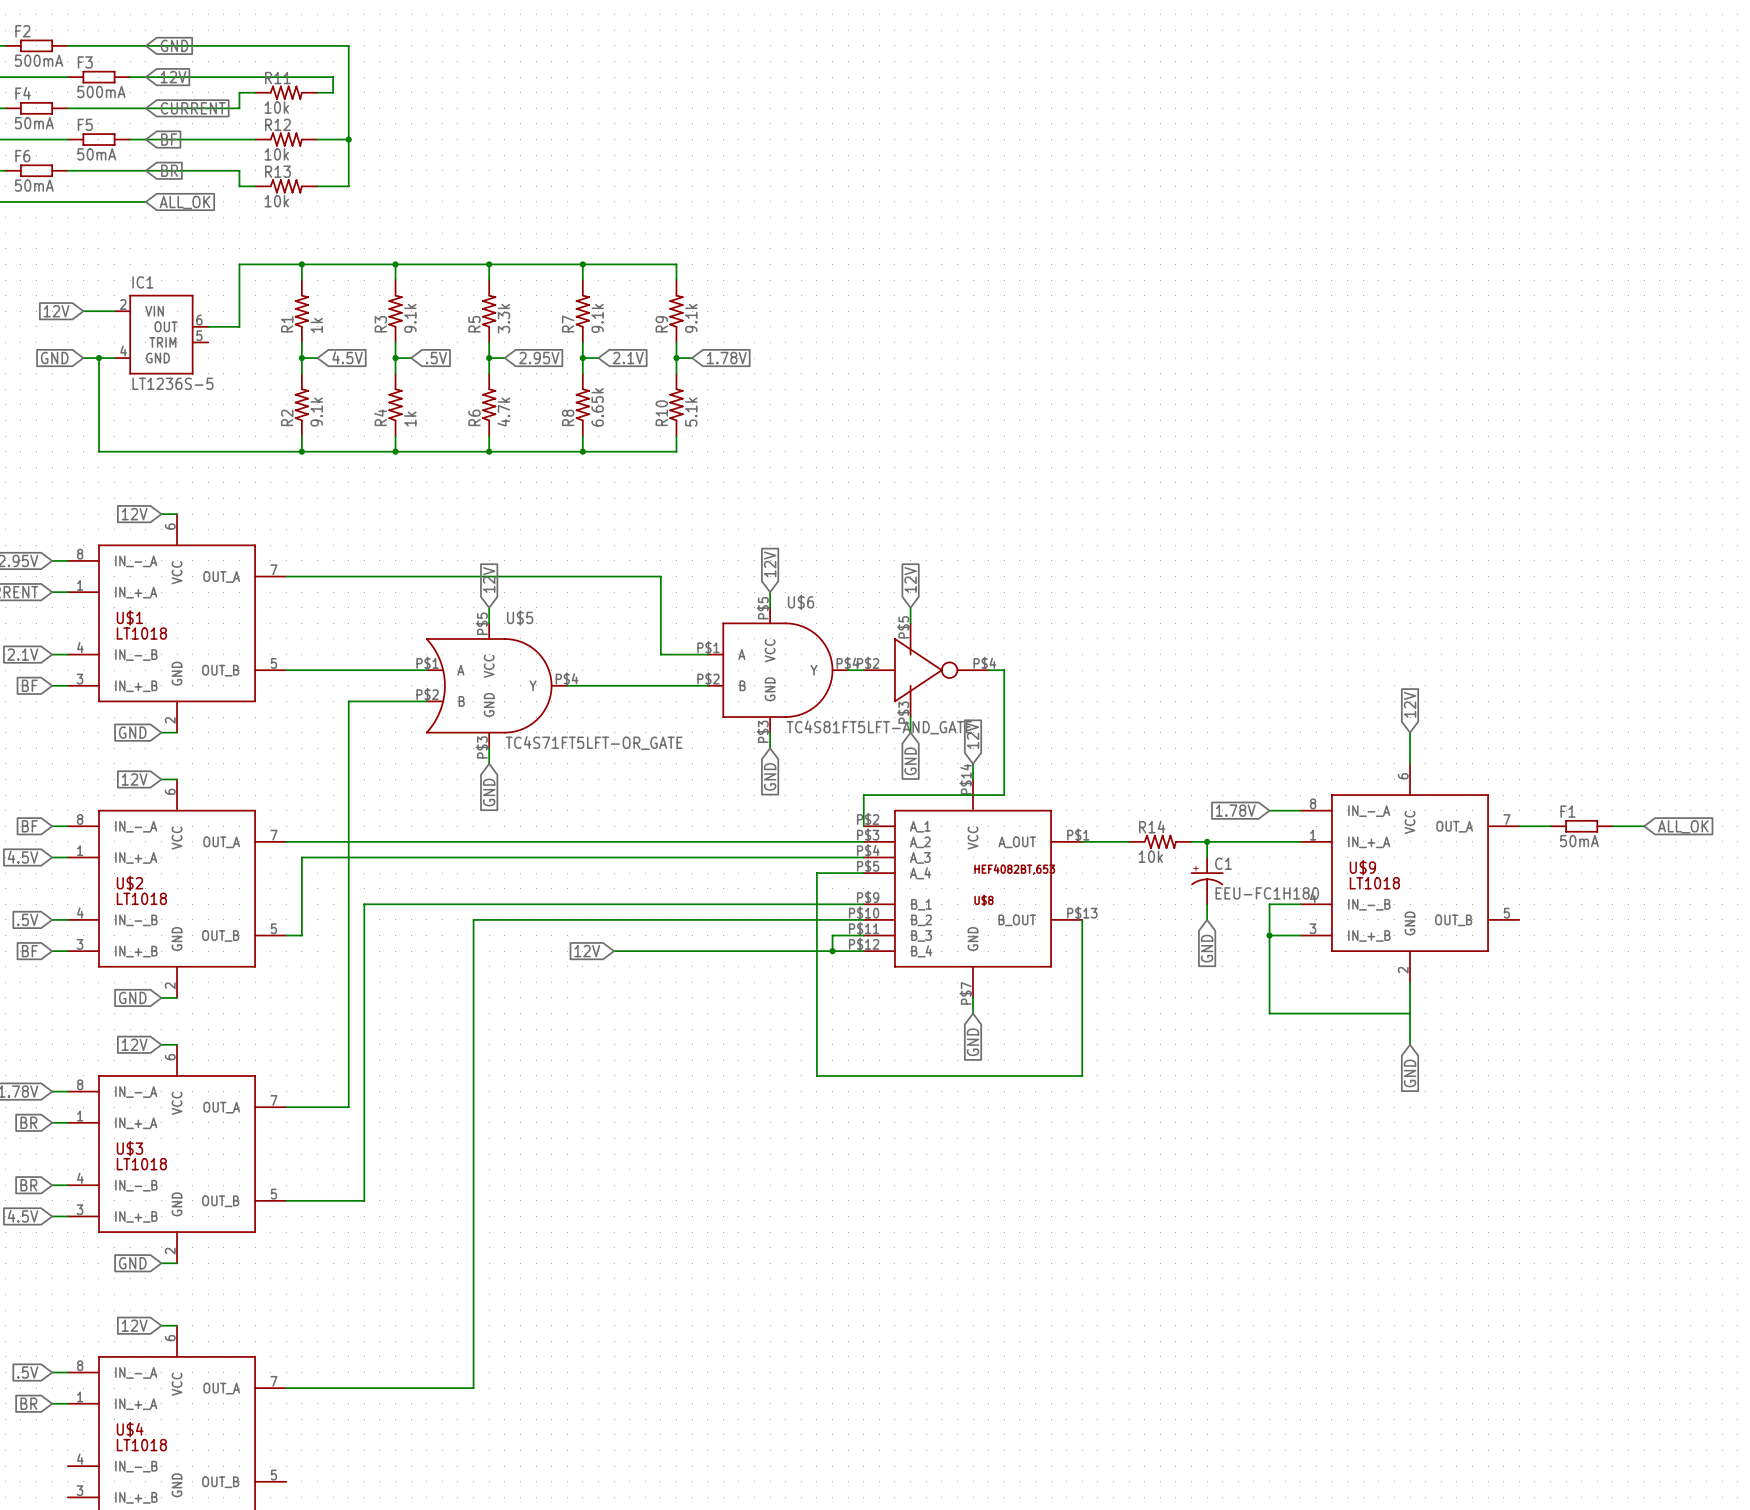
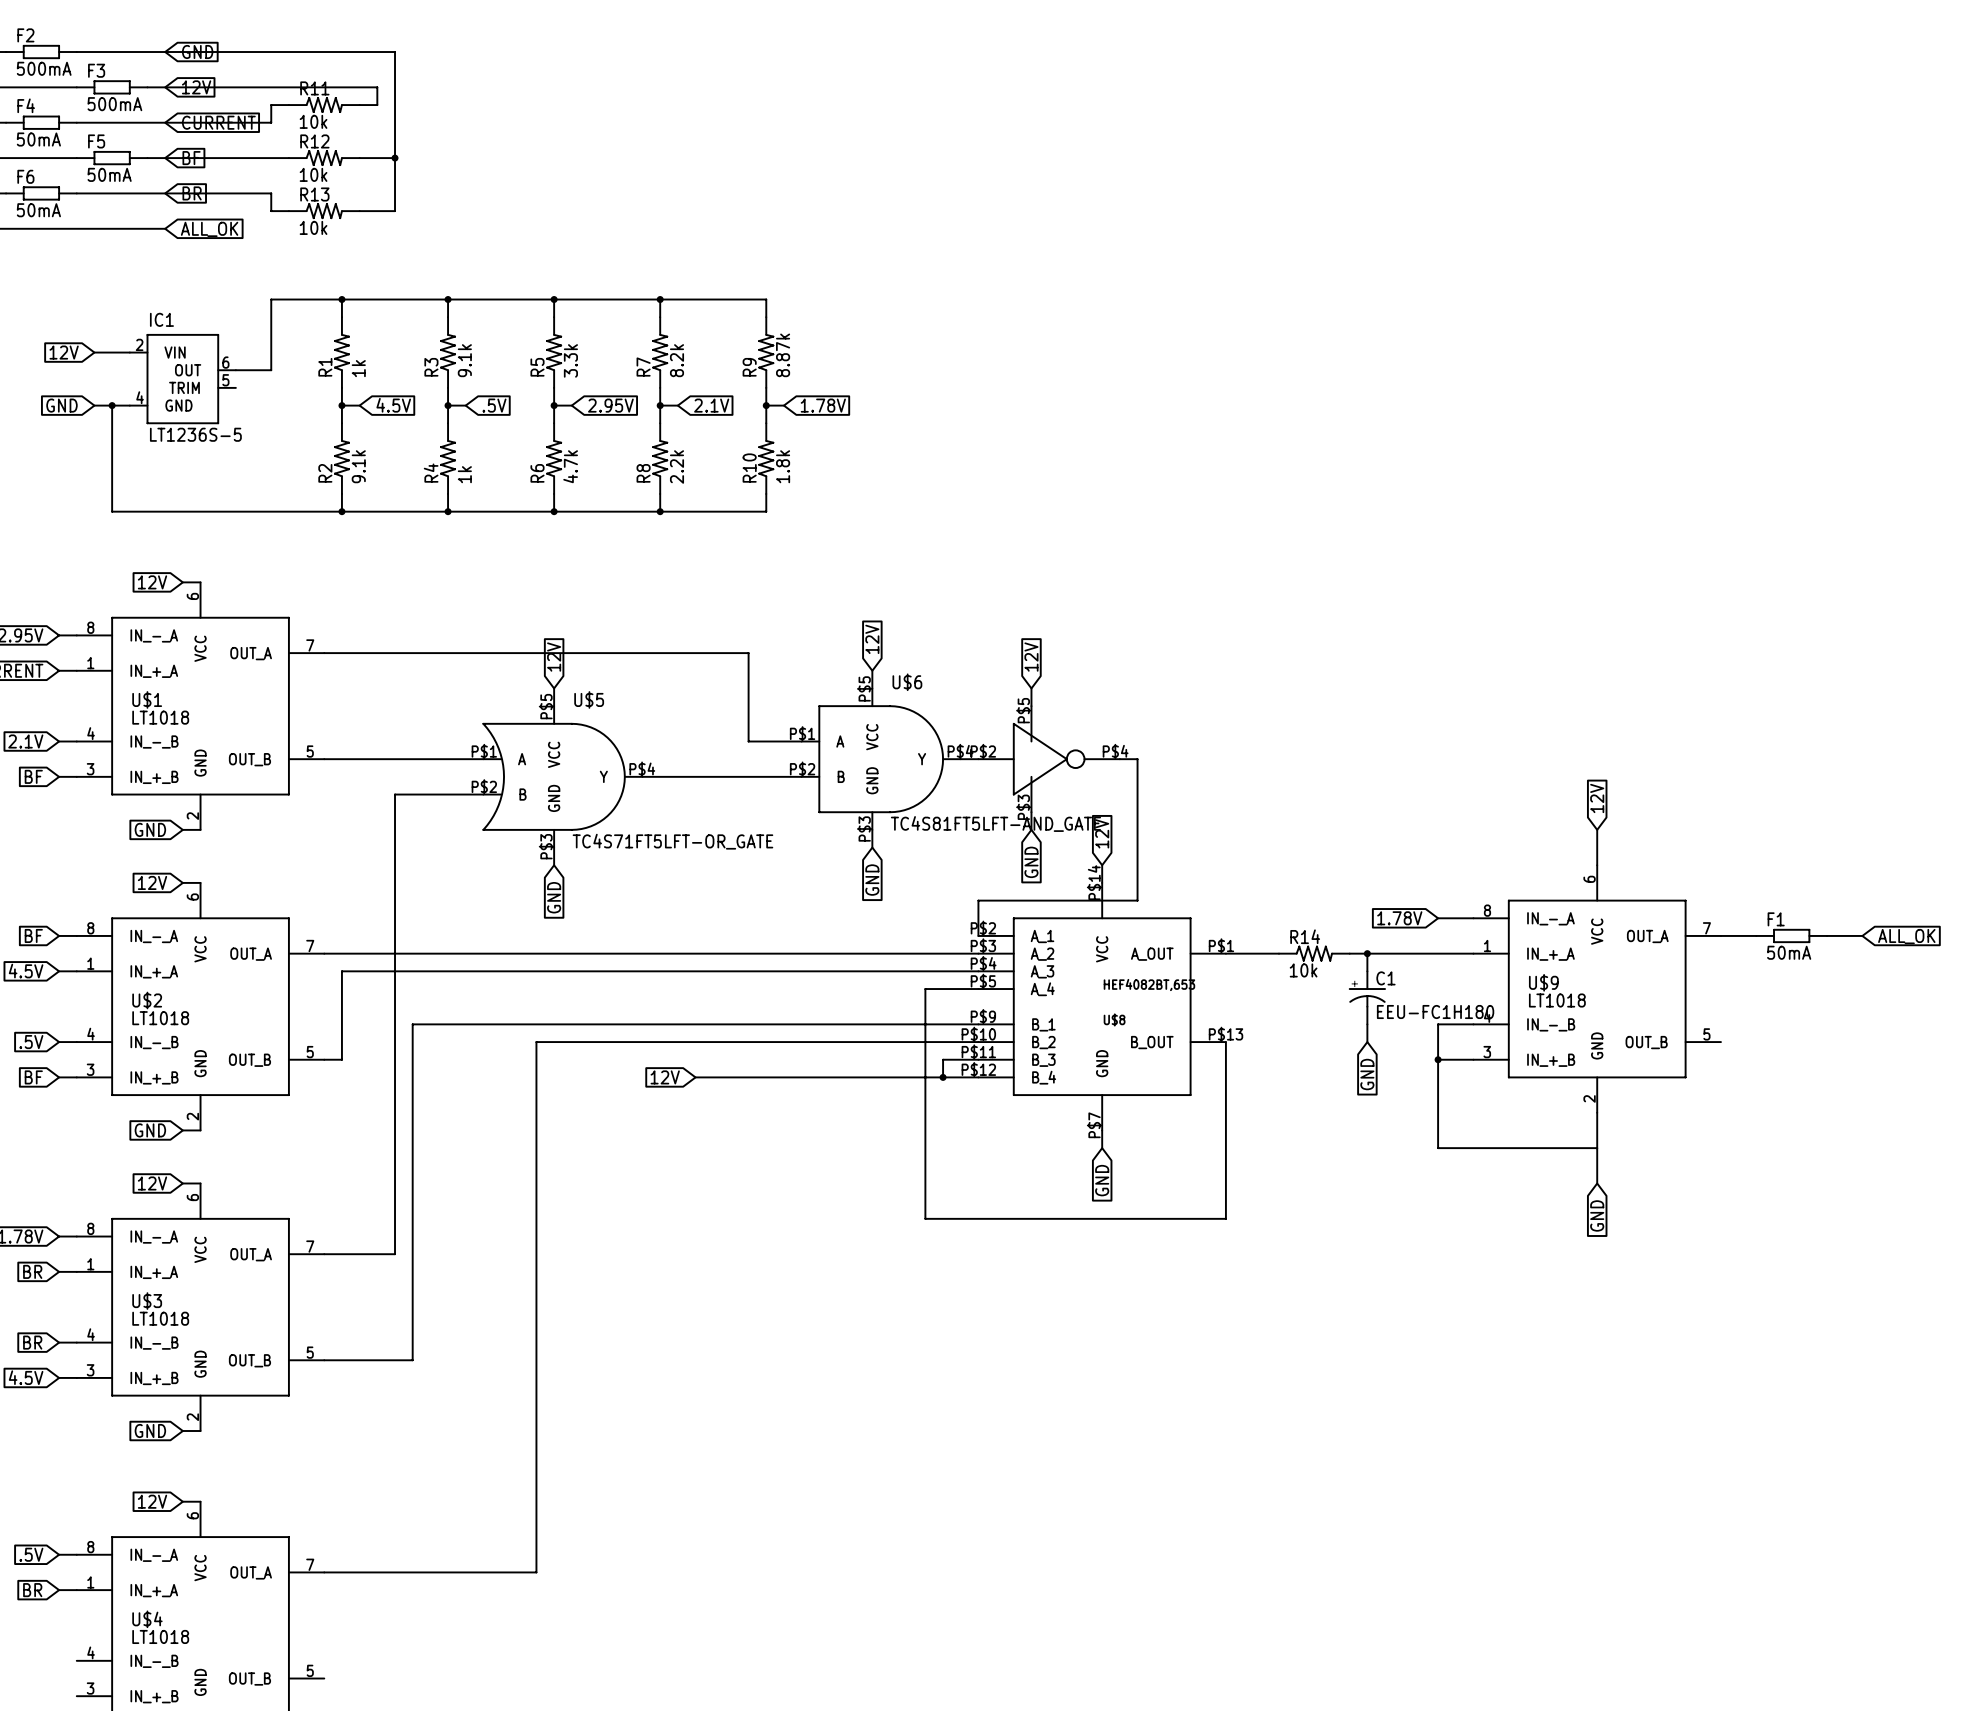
R7 value: 9.1k (597, 318) -> 8.2k (676, 360)
R9 value: 9.1k (691, 318) -> 8.87k (783, 355)
R8 value: 6.65k (597, 407) -> 2.2k (676, 466)
R10 value: 5.1k (691, 412) -> 1.8k (783, 466)

